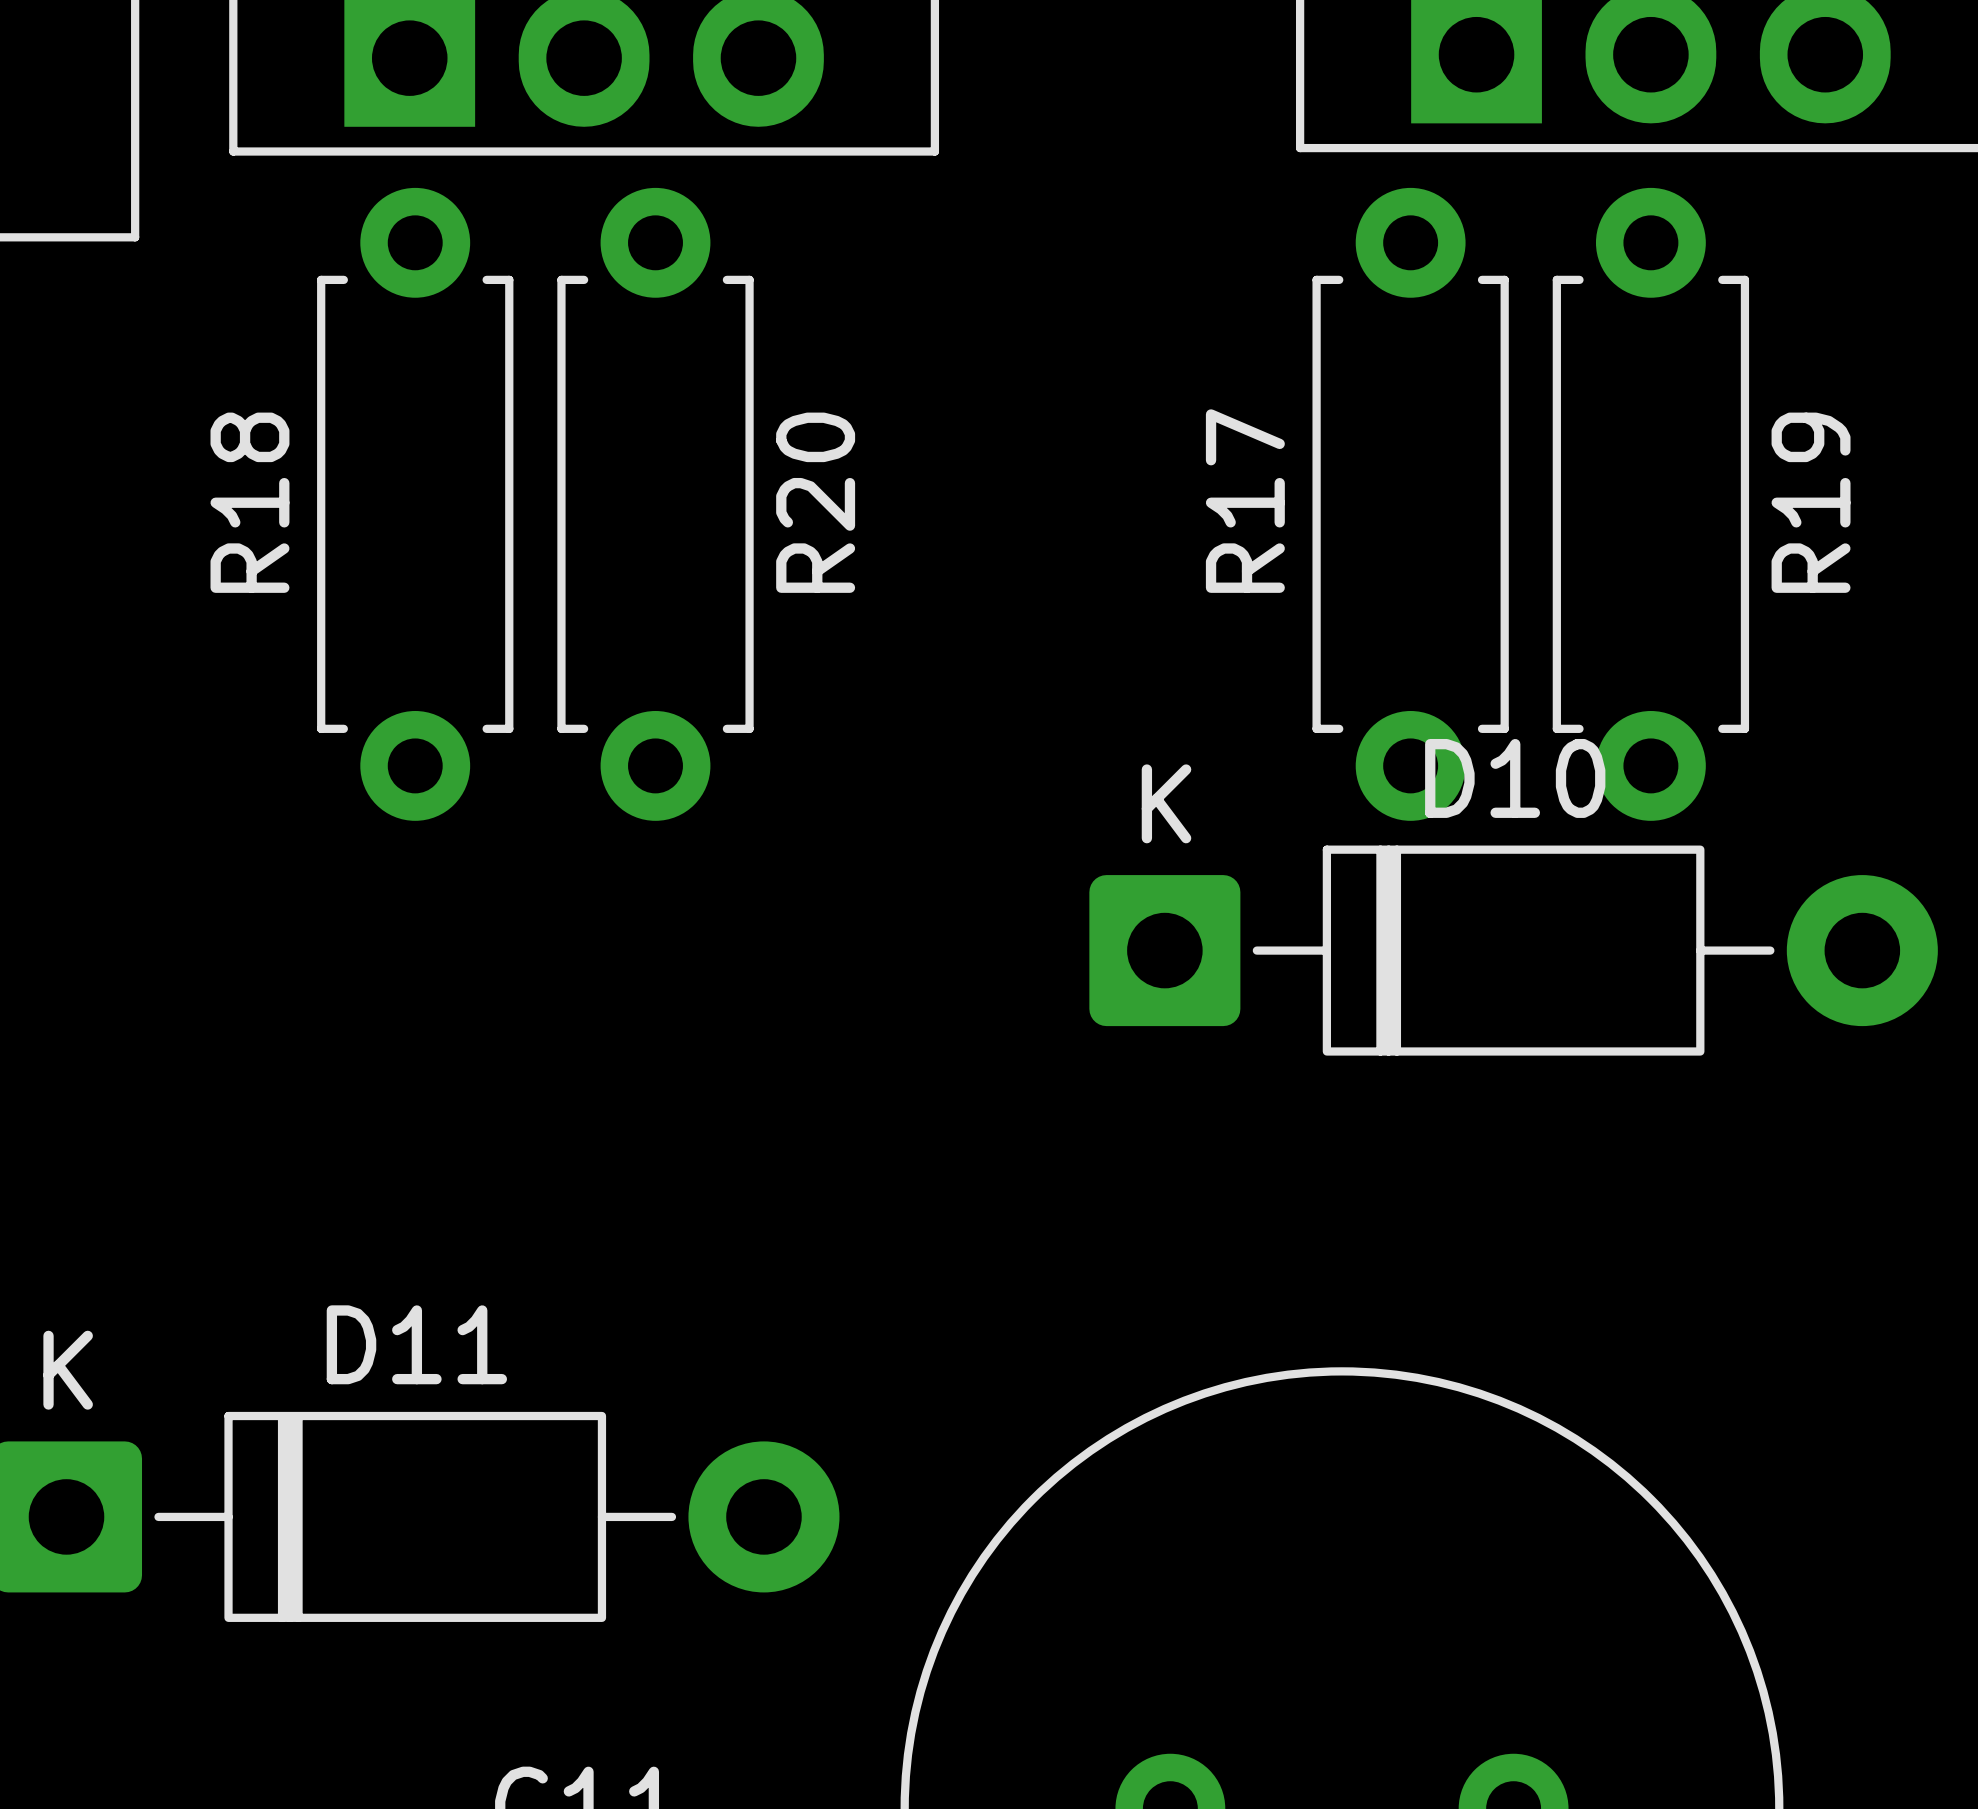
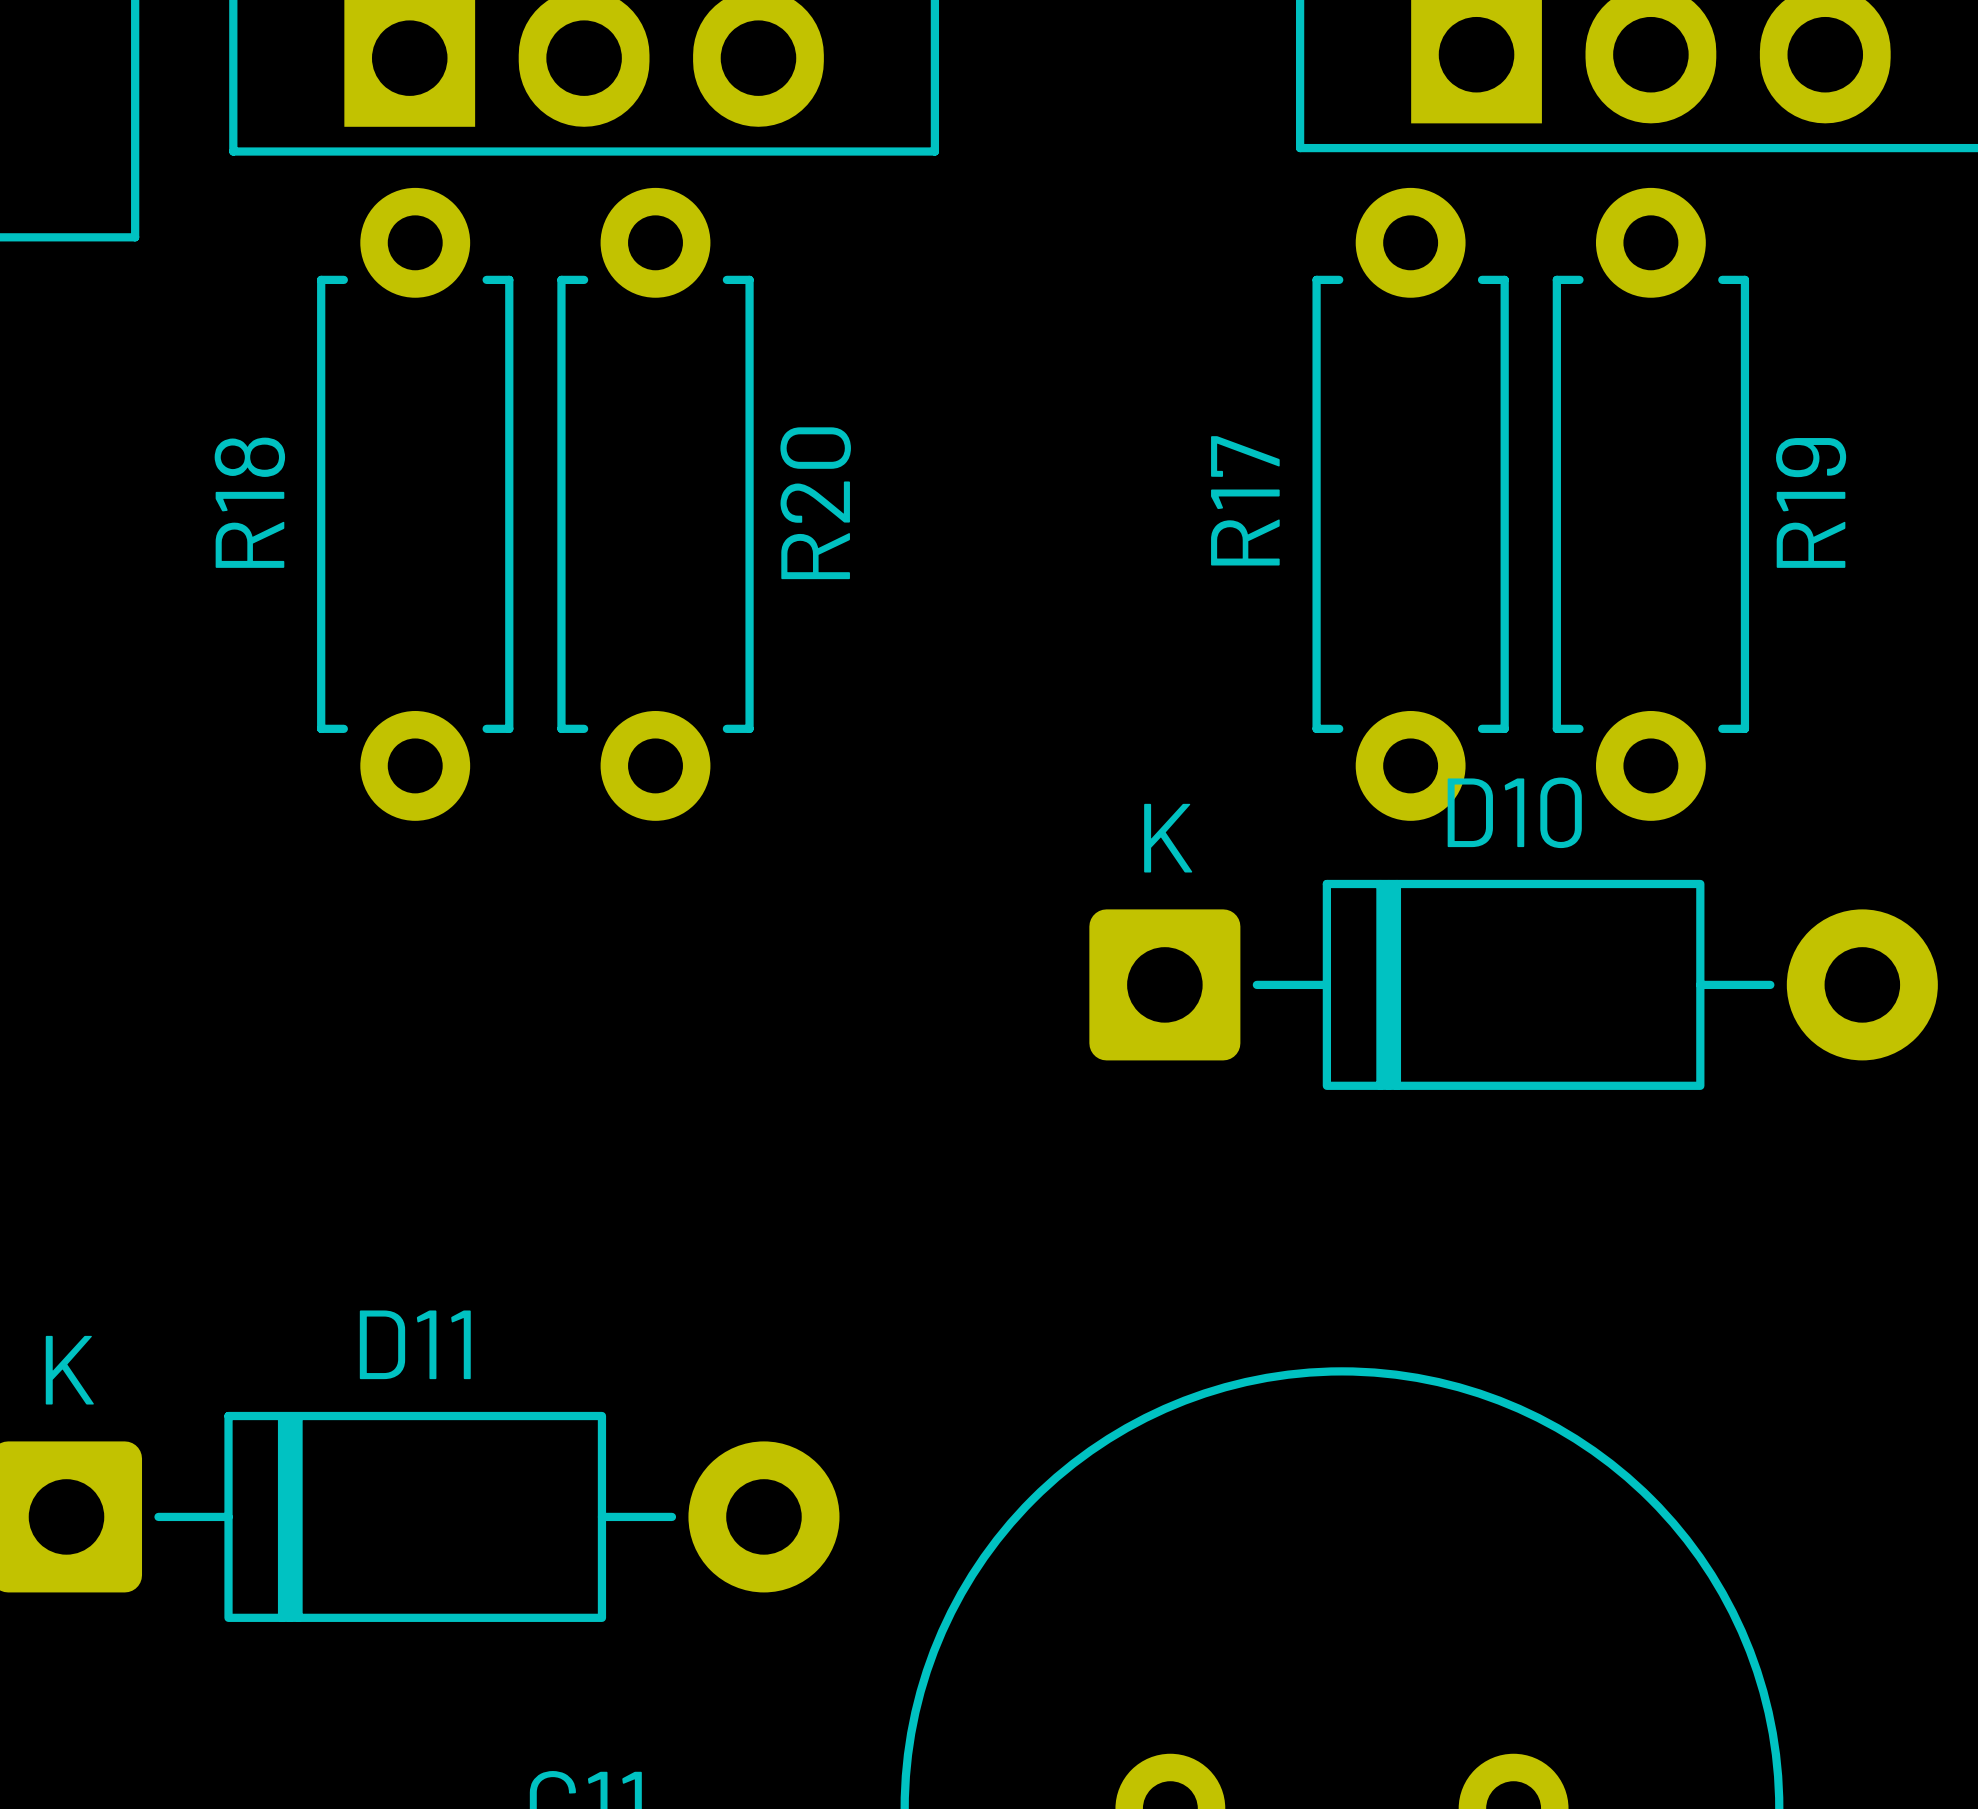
D10 position: (1513, 950) -> (1513, 984)

